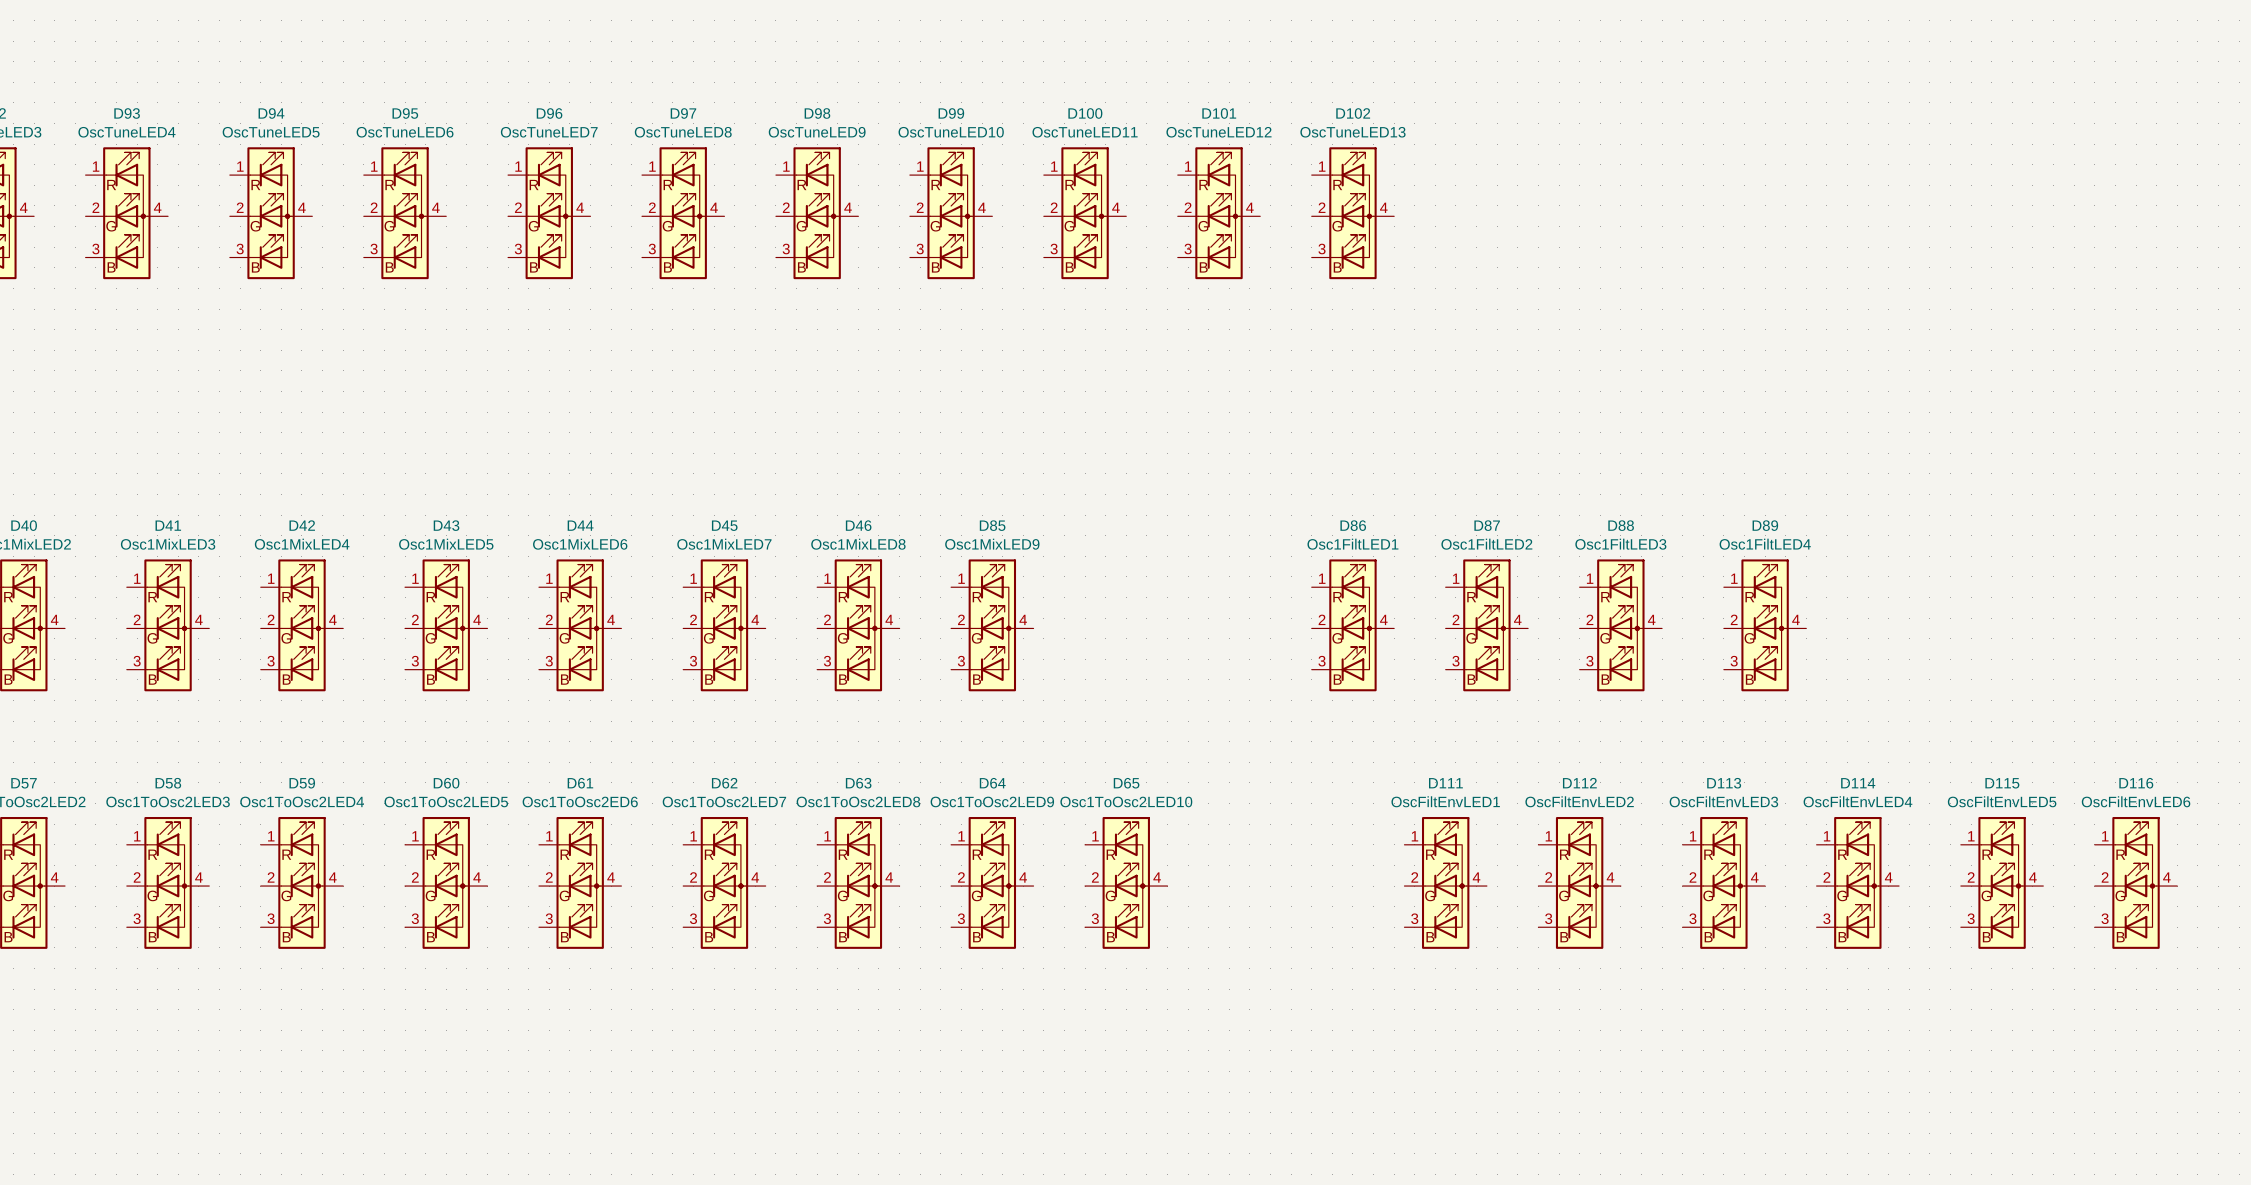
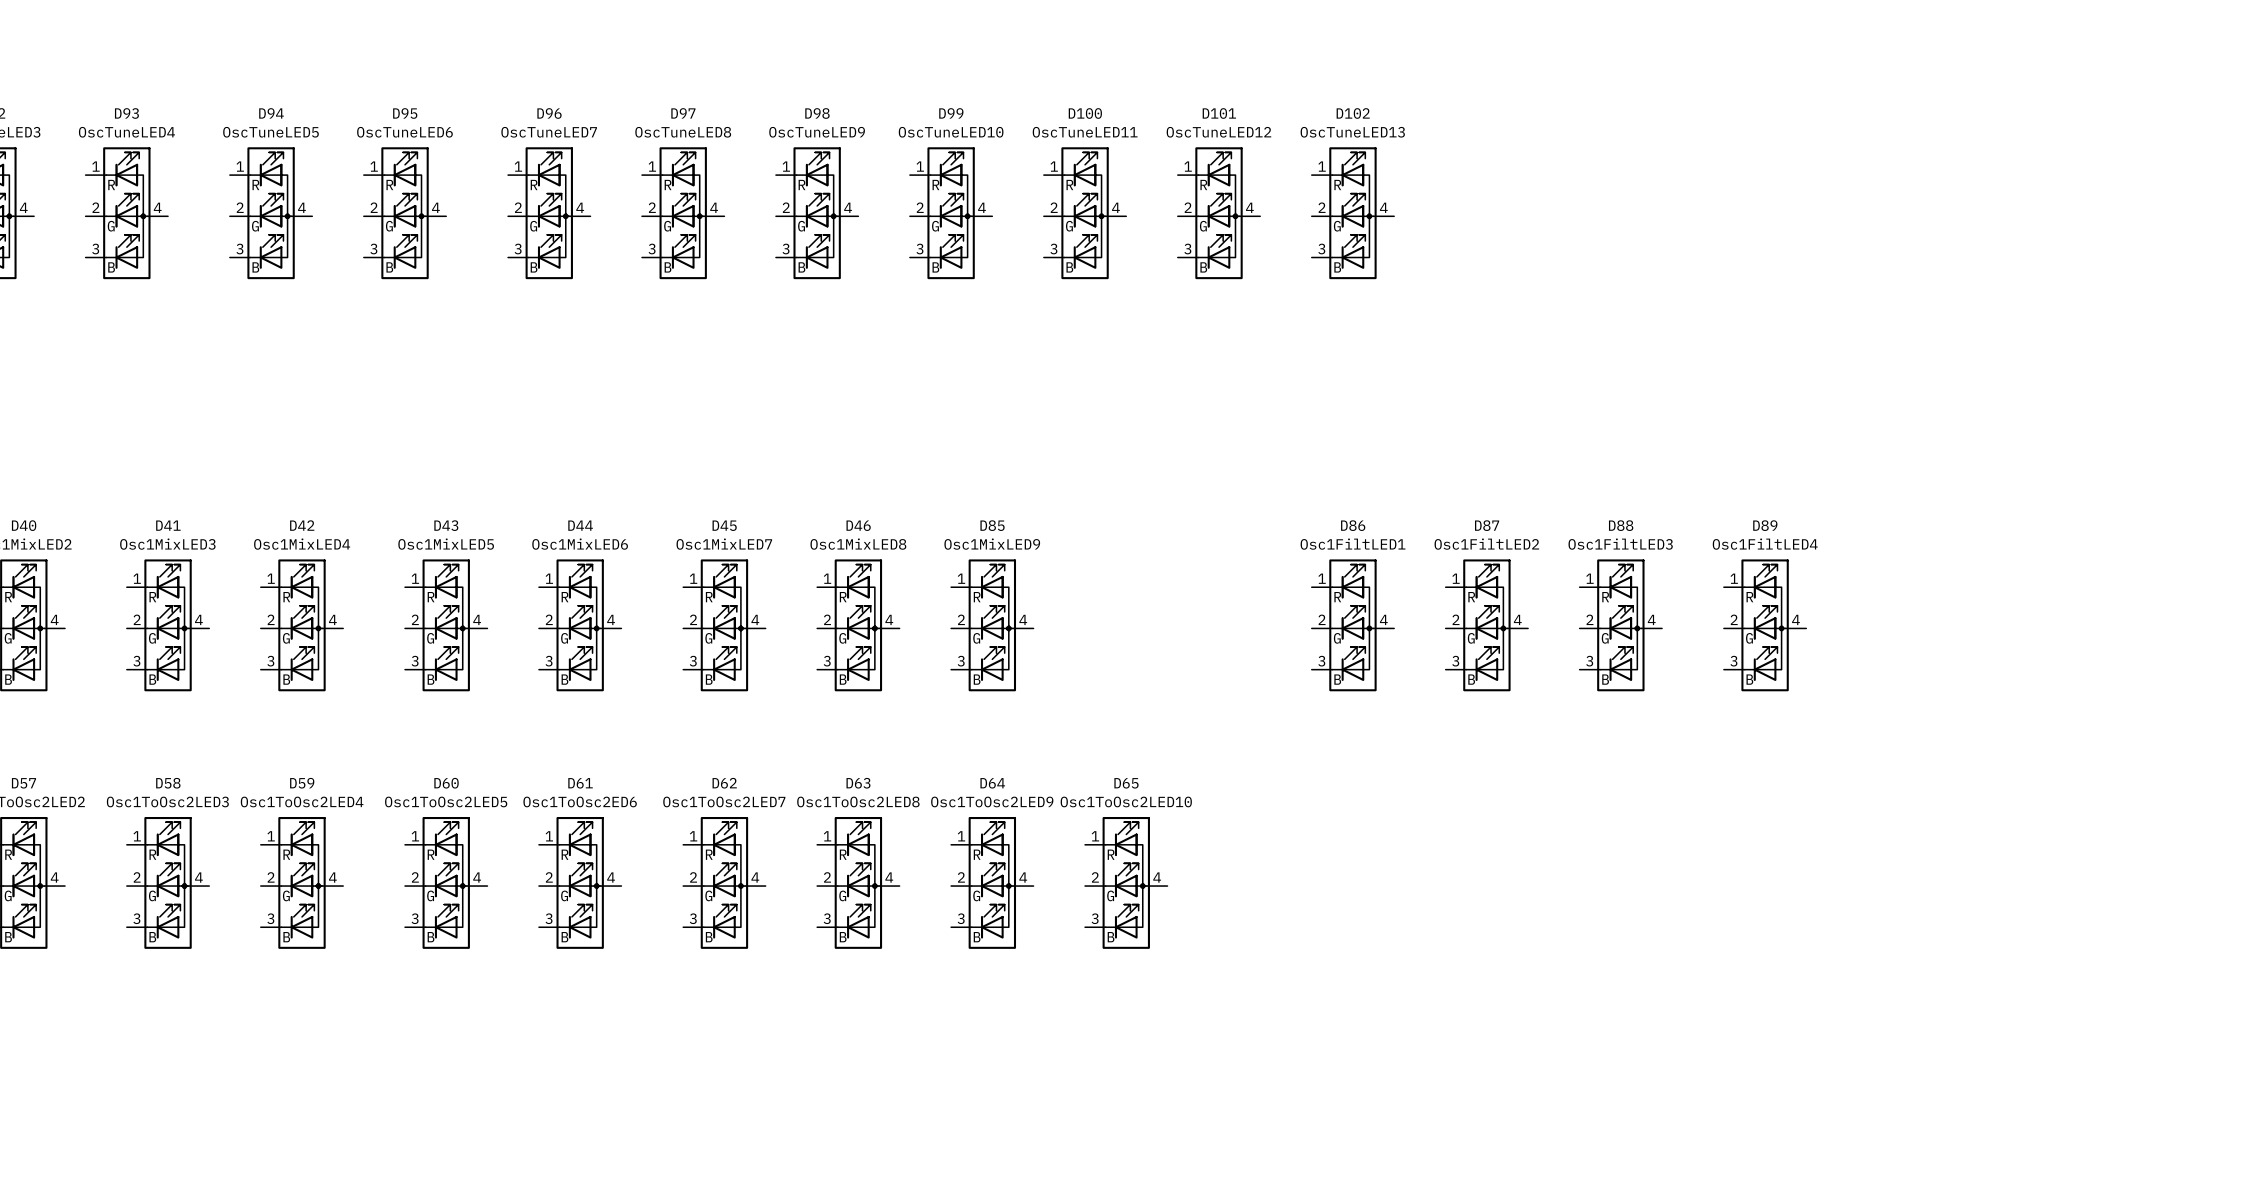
D111: OscFiltEnvLED1 (1445, 882) -> none
D112: OscFiltEnvLED2 (1579, 882) -> none
D113: OscFiltEnvLED3 (1723, 882) -> none
D114: OscFiltEnvLED4 (1857, 882) -> none
D115: OscFiltEnvLED5 (2002, 882) -> none
D116: OscFiltEnvLED6 (2136, 882) -> none

